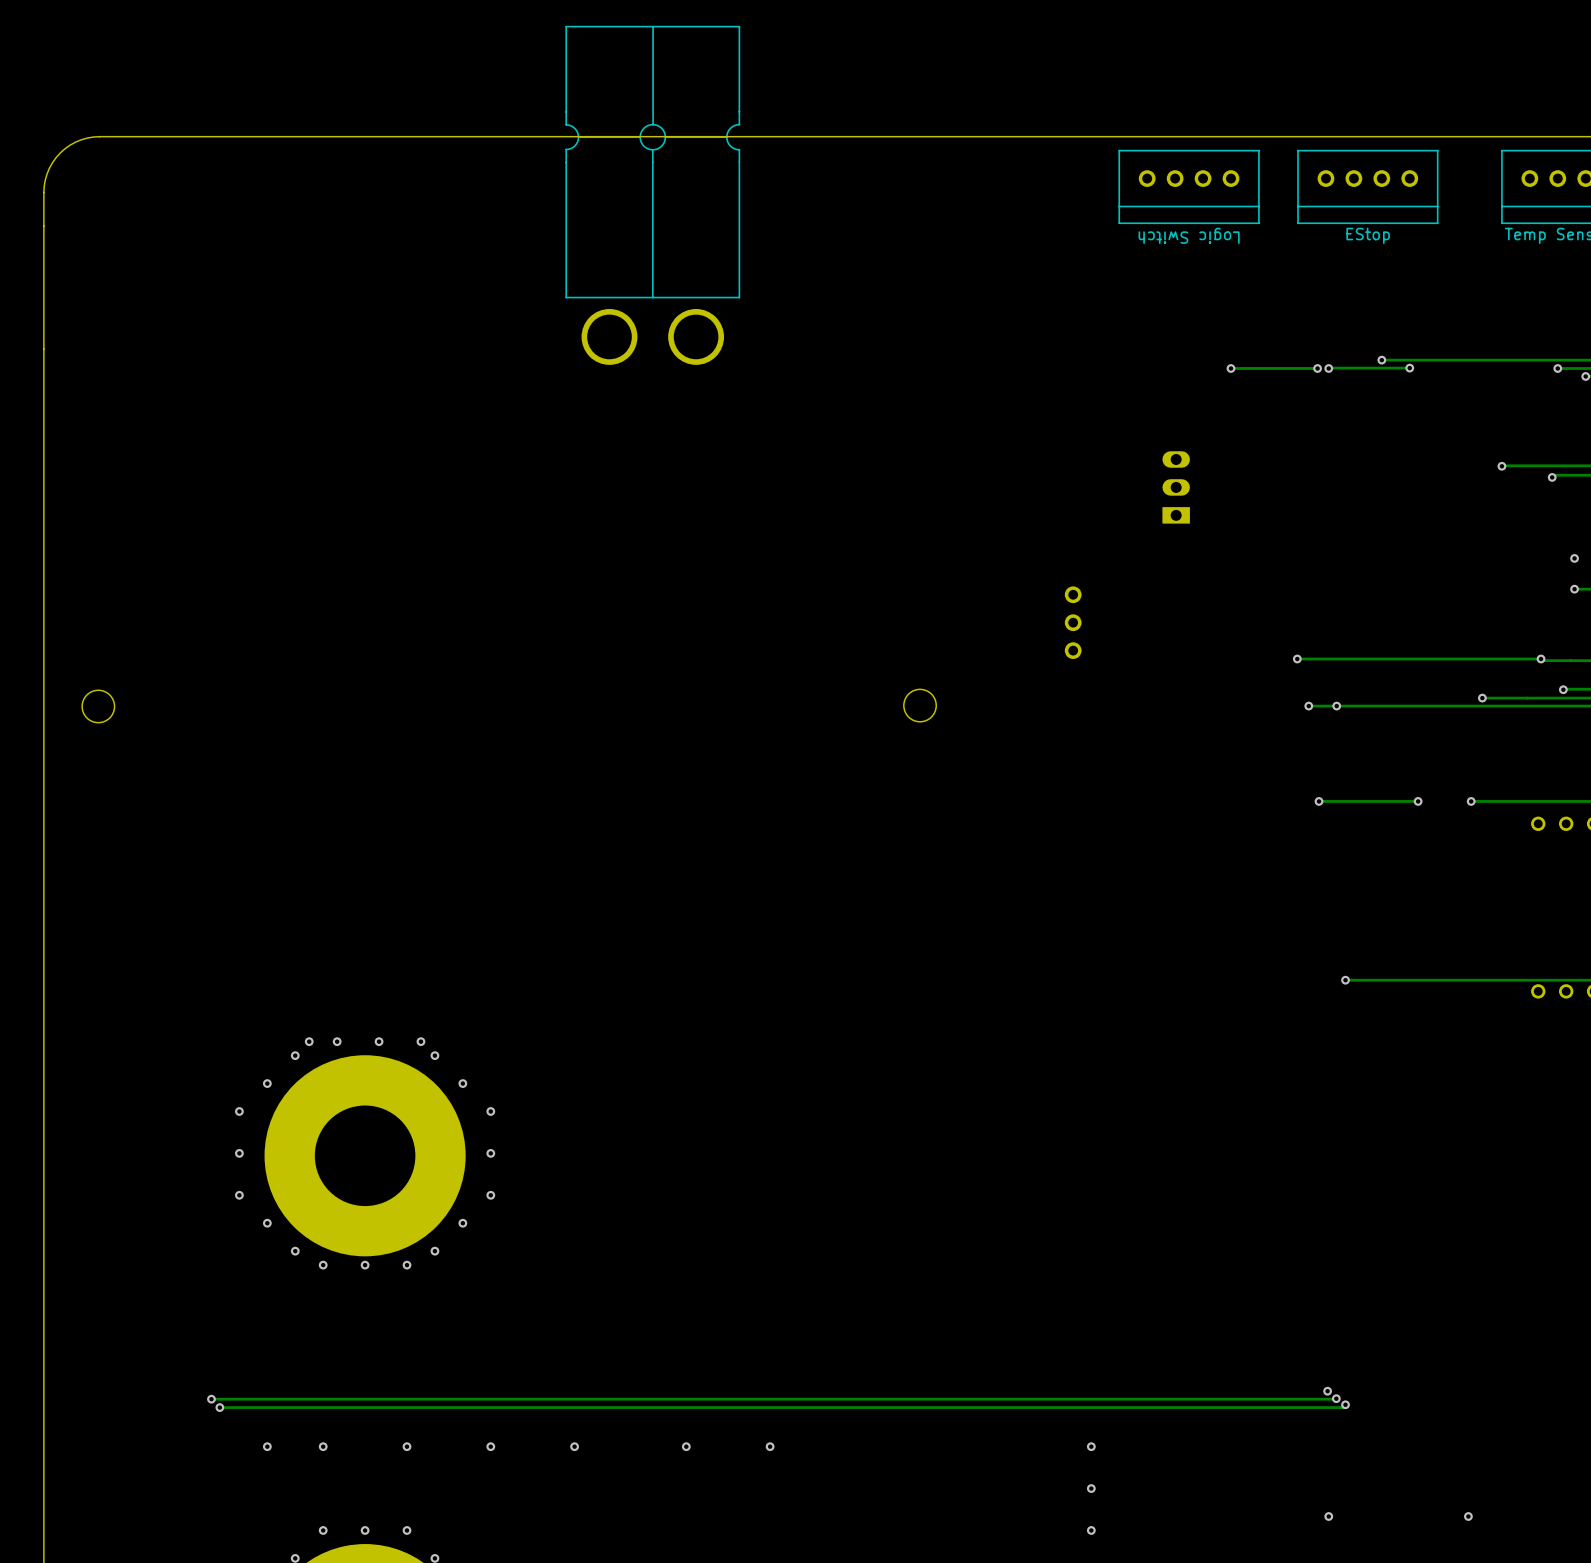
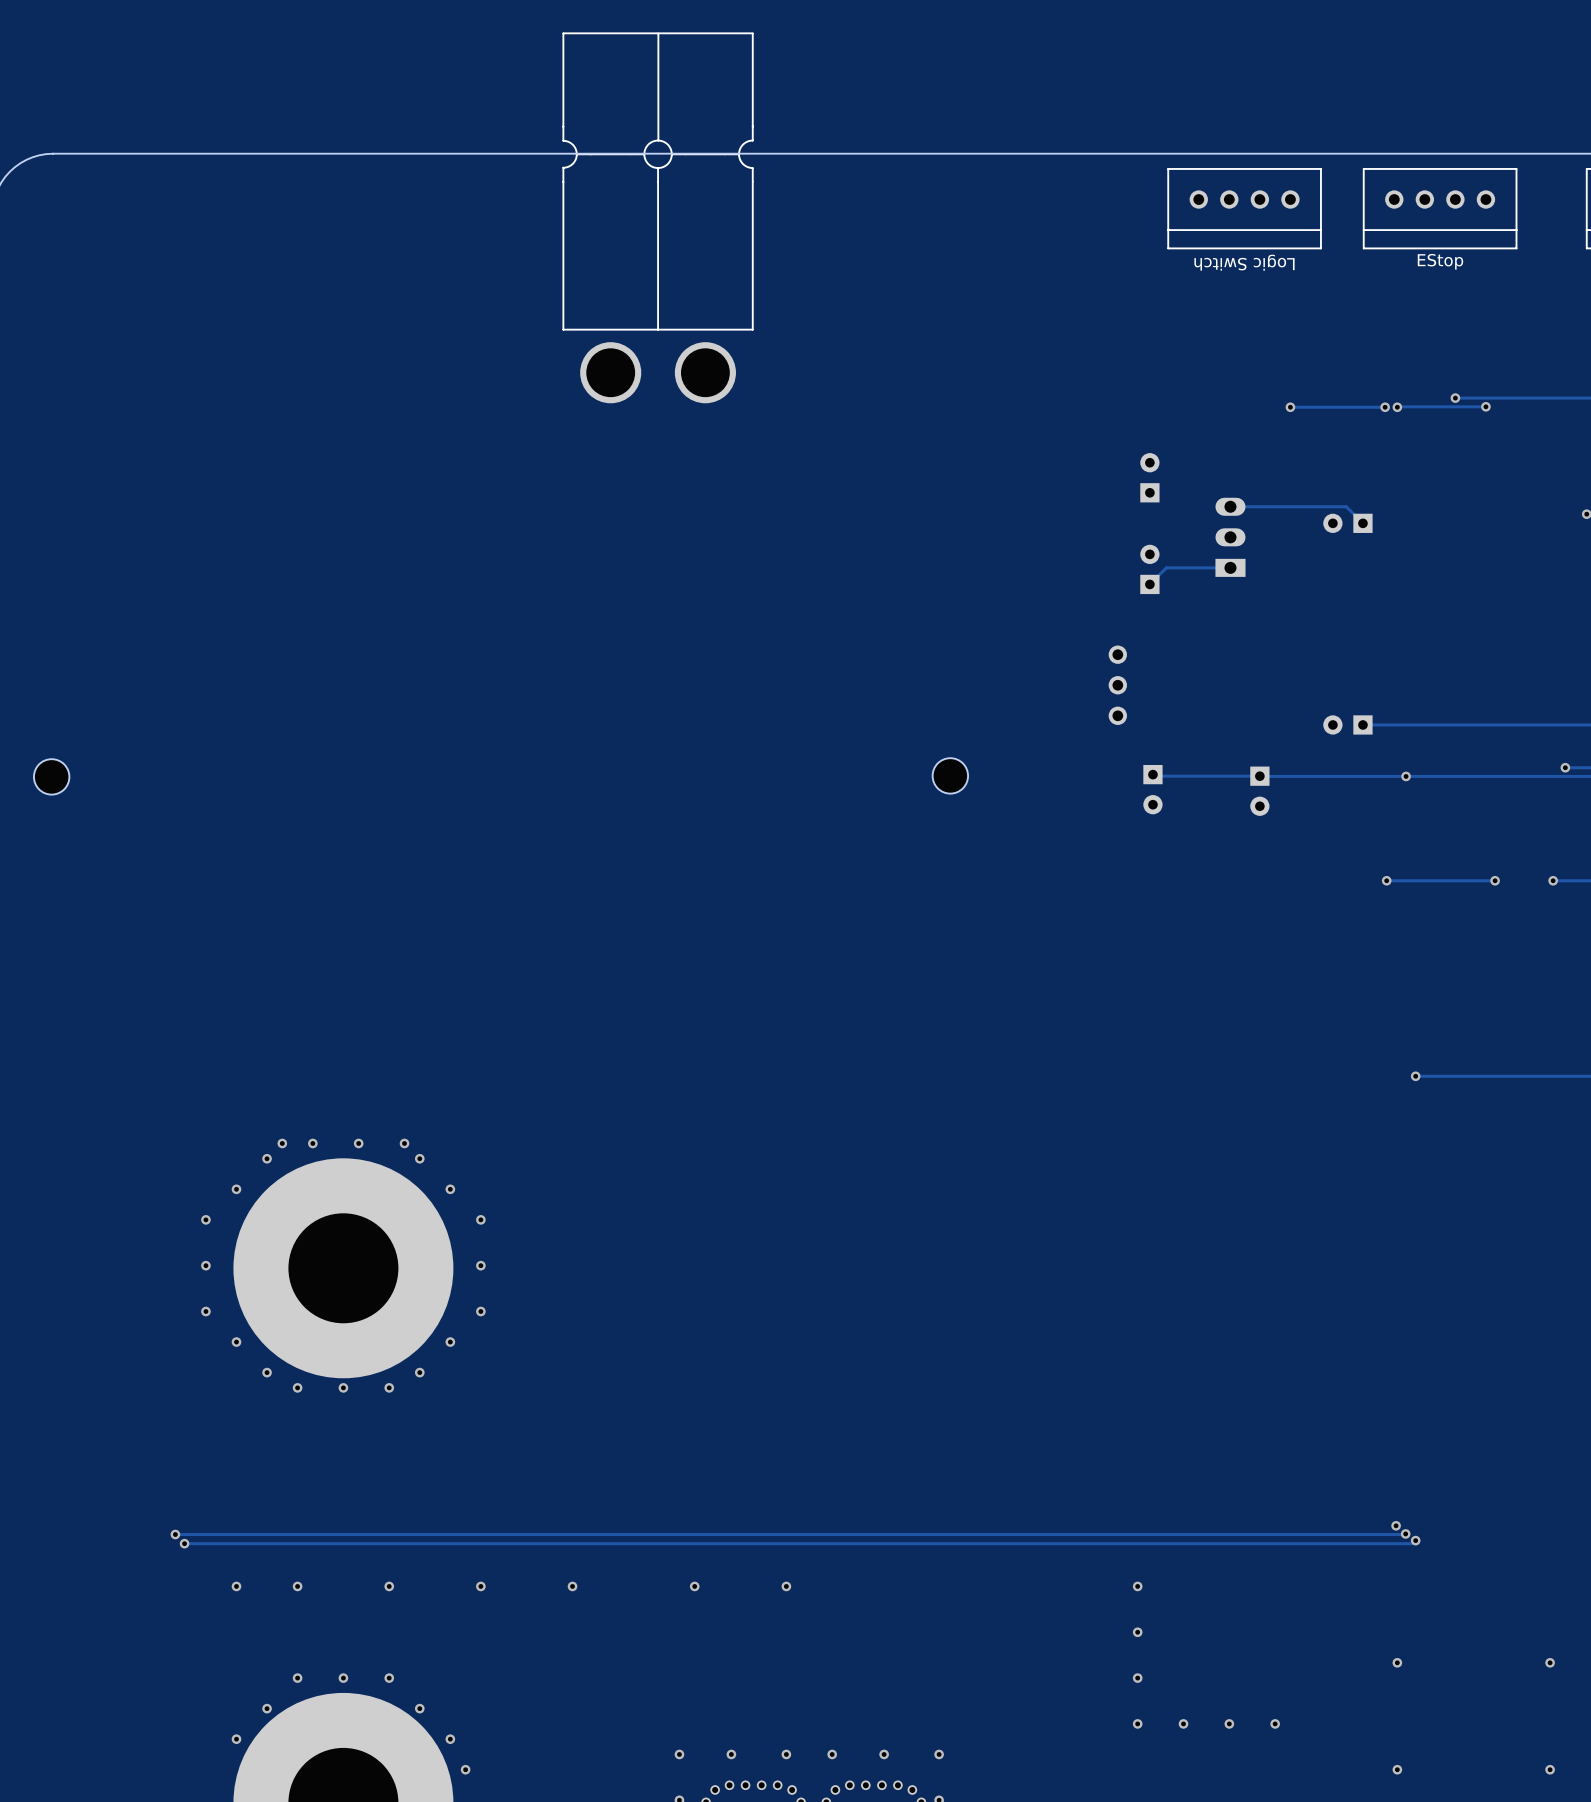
part: none -> (1149, 477)
track: none -> (1230, 506) (1346, 506) (1362, 523)
part: none -> (1347, 523)
track: none -> (1230, 567) (1166, 567) (1149, 584)
part: none -> (1149, 569)
part: none -> (1347, 724)
via: (1297, 658) -> none
track: none -> (1152, 774) (1154, 776) (1375, 776)
via: (1308, 706) -> none
part: none -> (1152, 789)
part: none -> (1259, 791)

